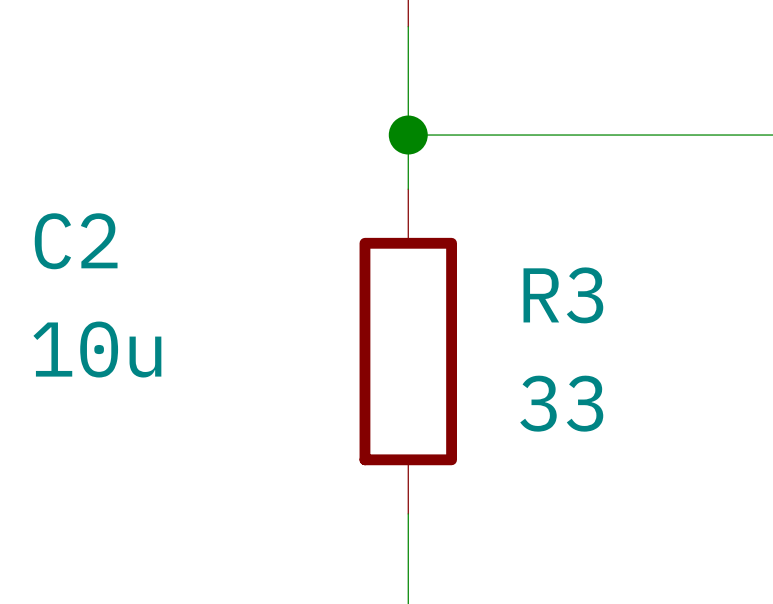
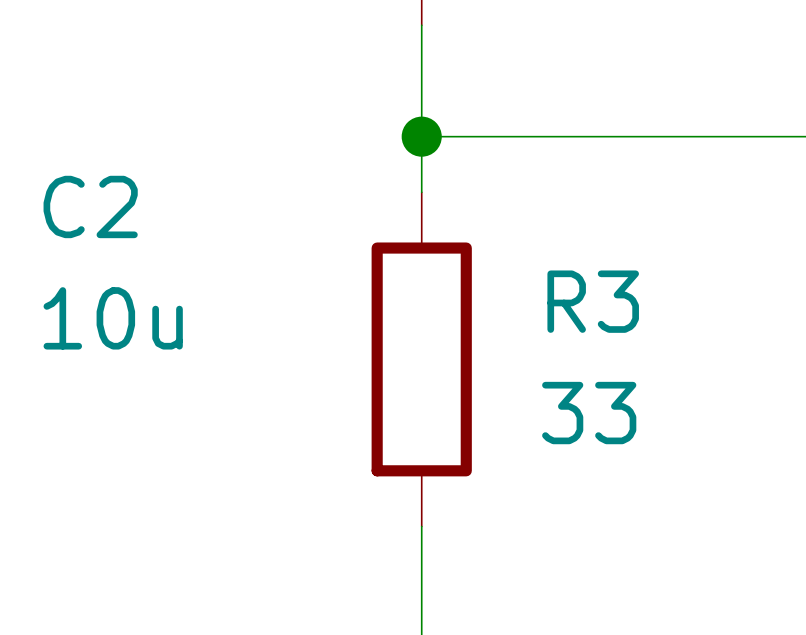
C2 name position: C2 (76, 241) -> C2 (90, 206)
C2 value position: 10u (97, 349) -> 10u (113, 318)

